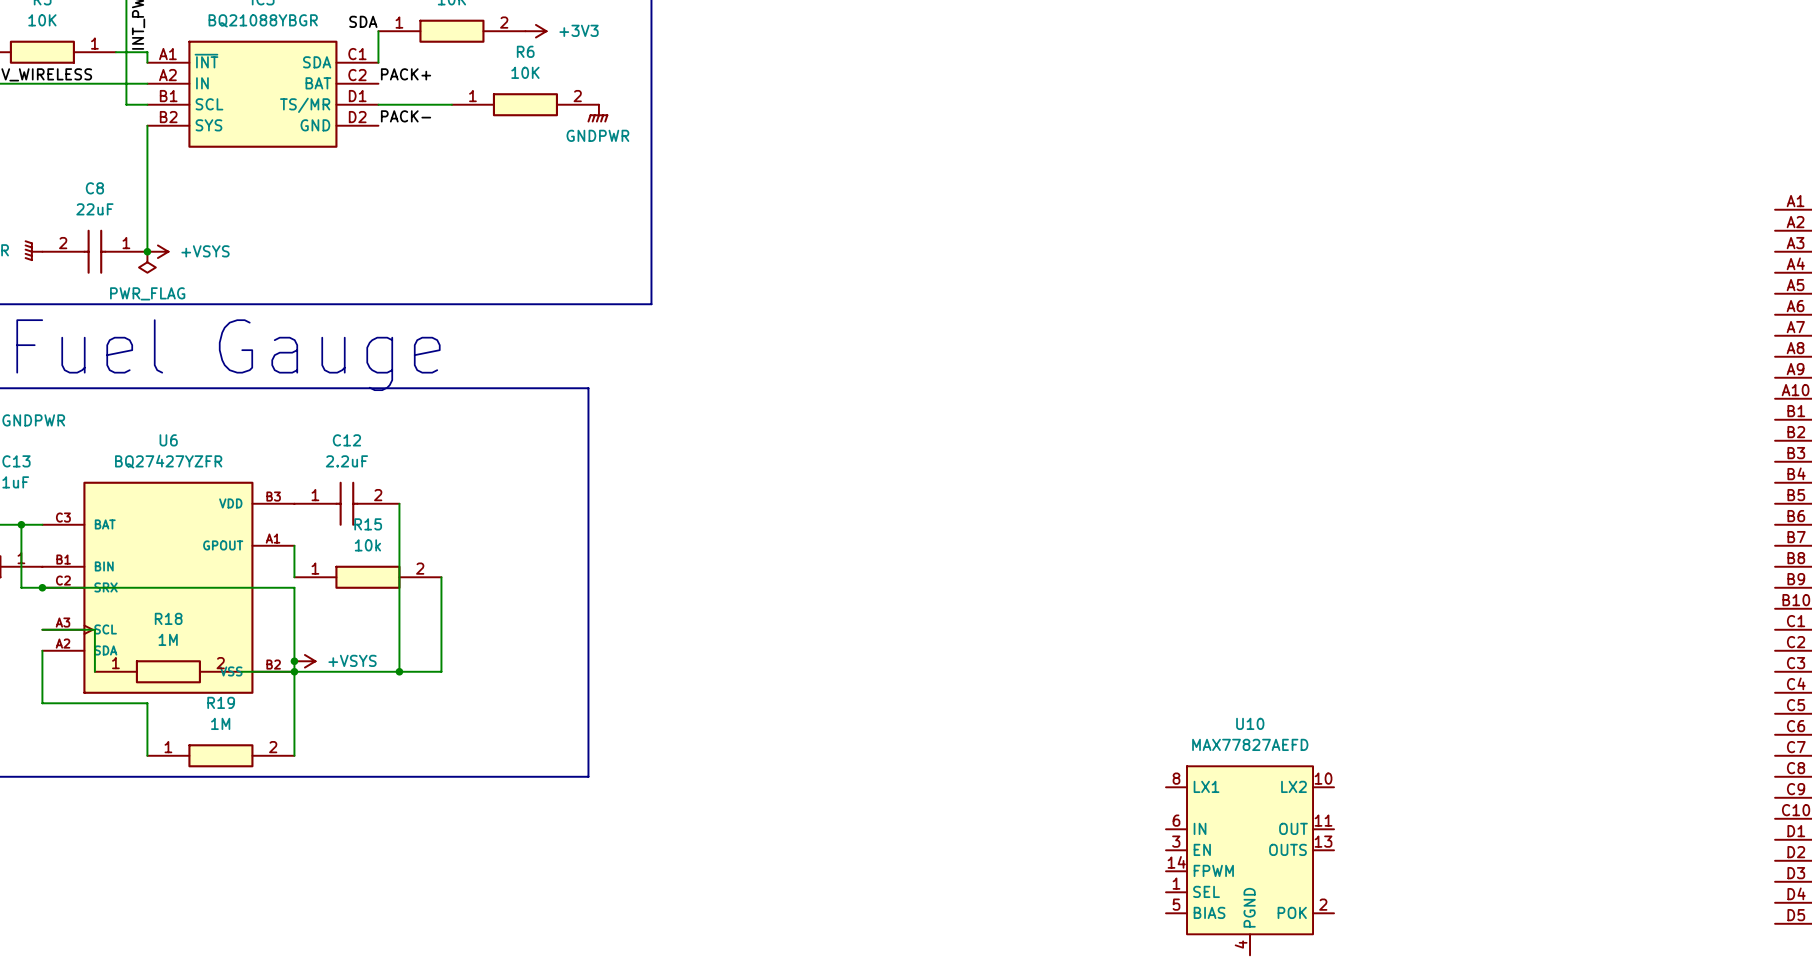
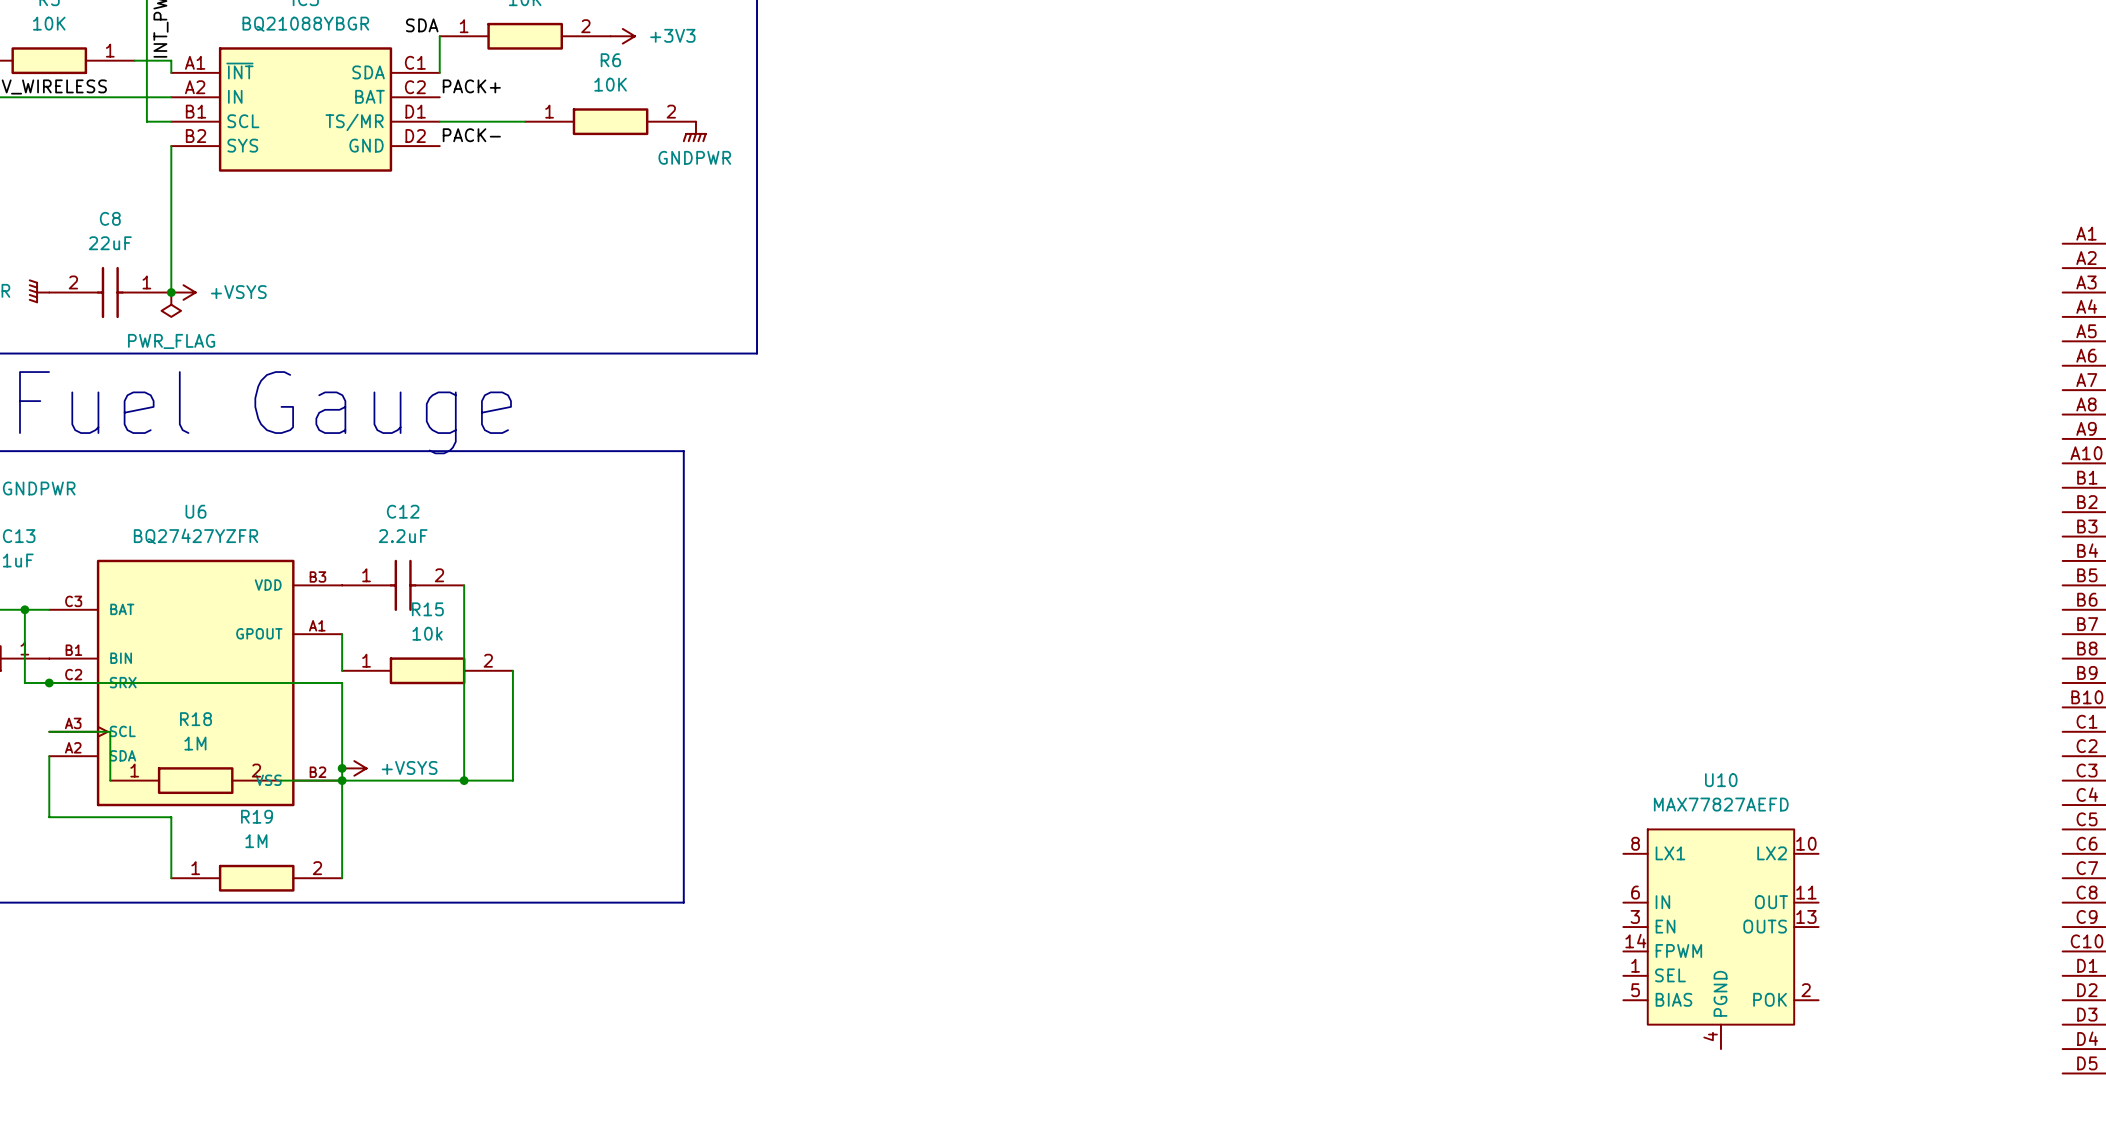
U10 position: (1250, 860) -> (1720, 939)

